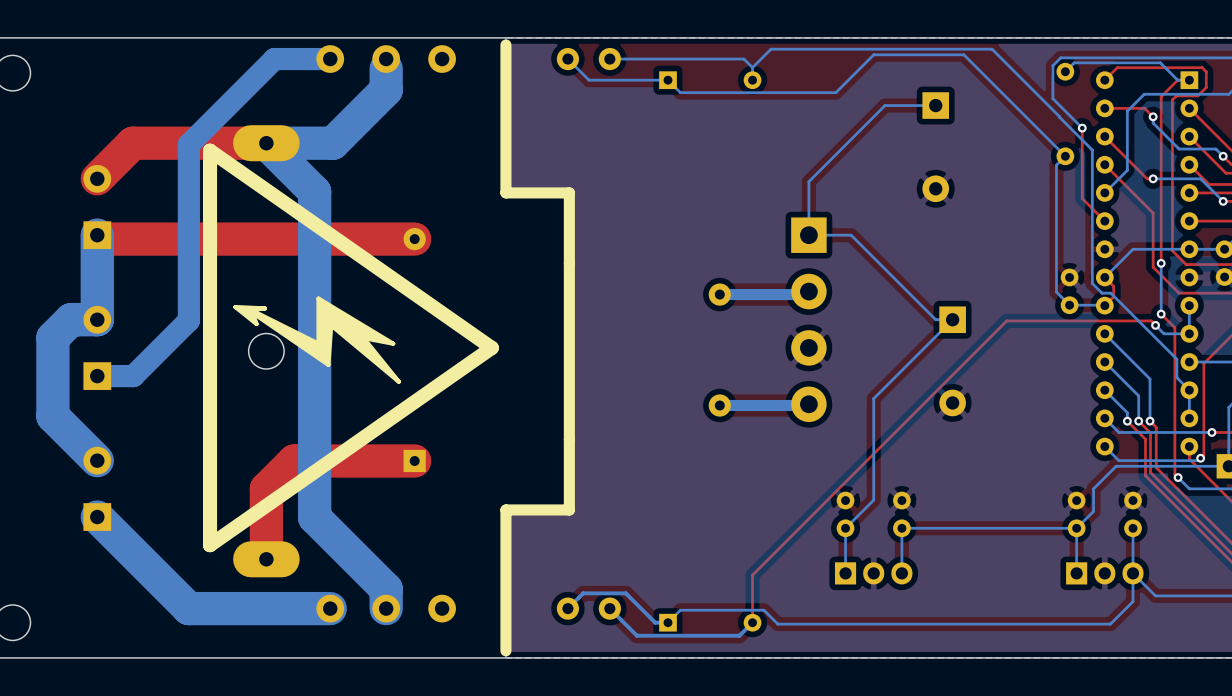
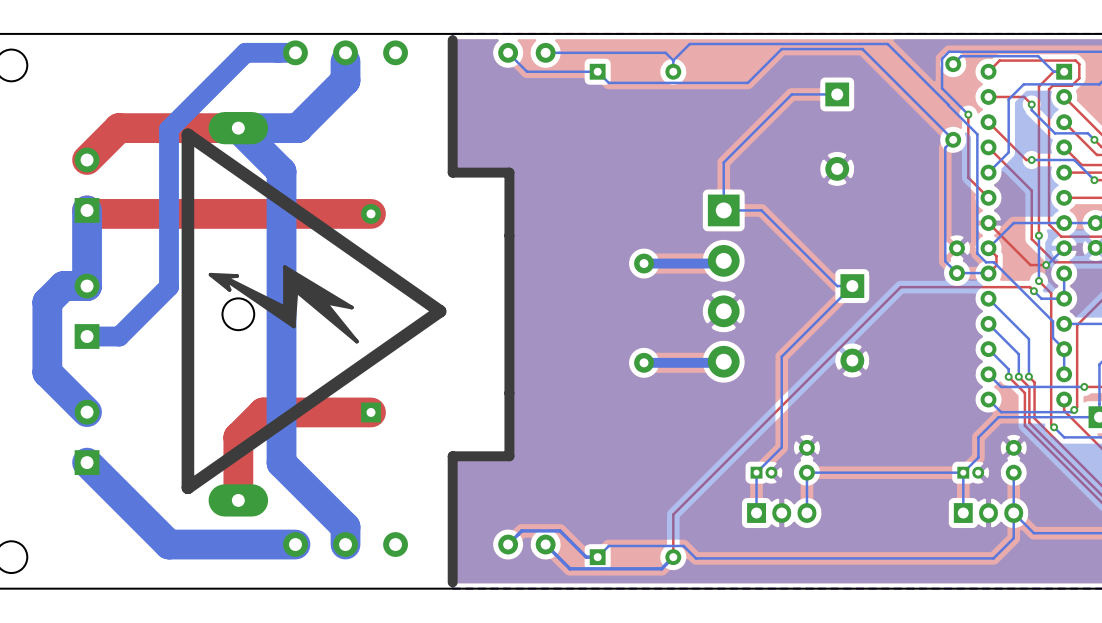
top track: none -> (988, 223) (1030, 265) (1046, 265)
bottom track: none -> (1064, 248) (1046, 265)
via: none -> (1046, 265)
part: (845, 514) -> none
part: (1076, 514) -> none
part: none -> (763, 472)
part: none -> (970, 472)

